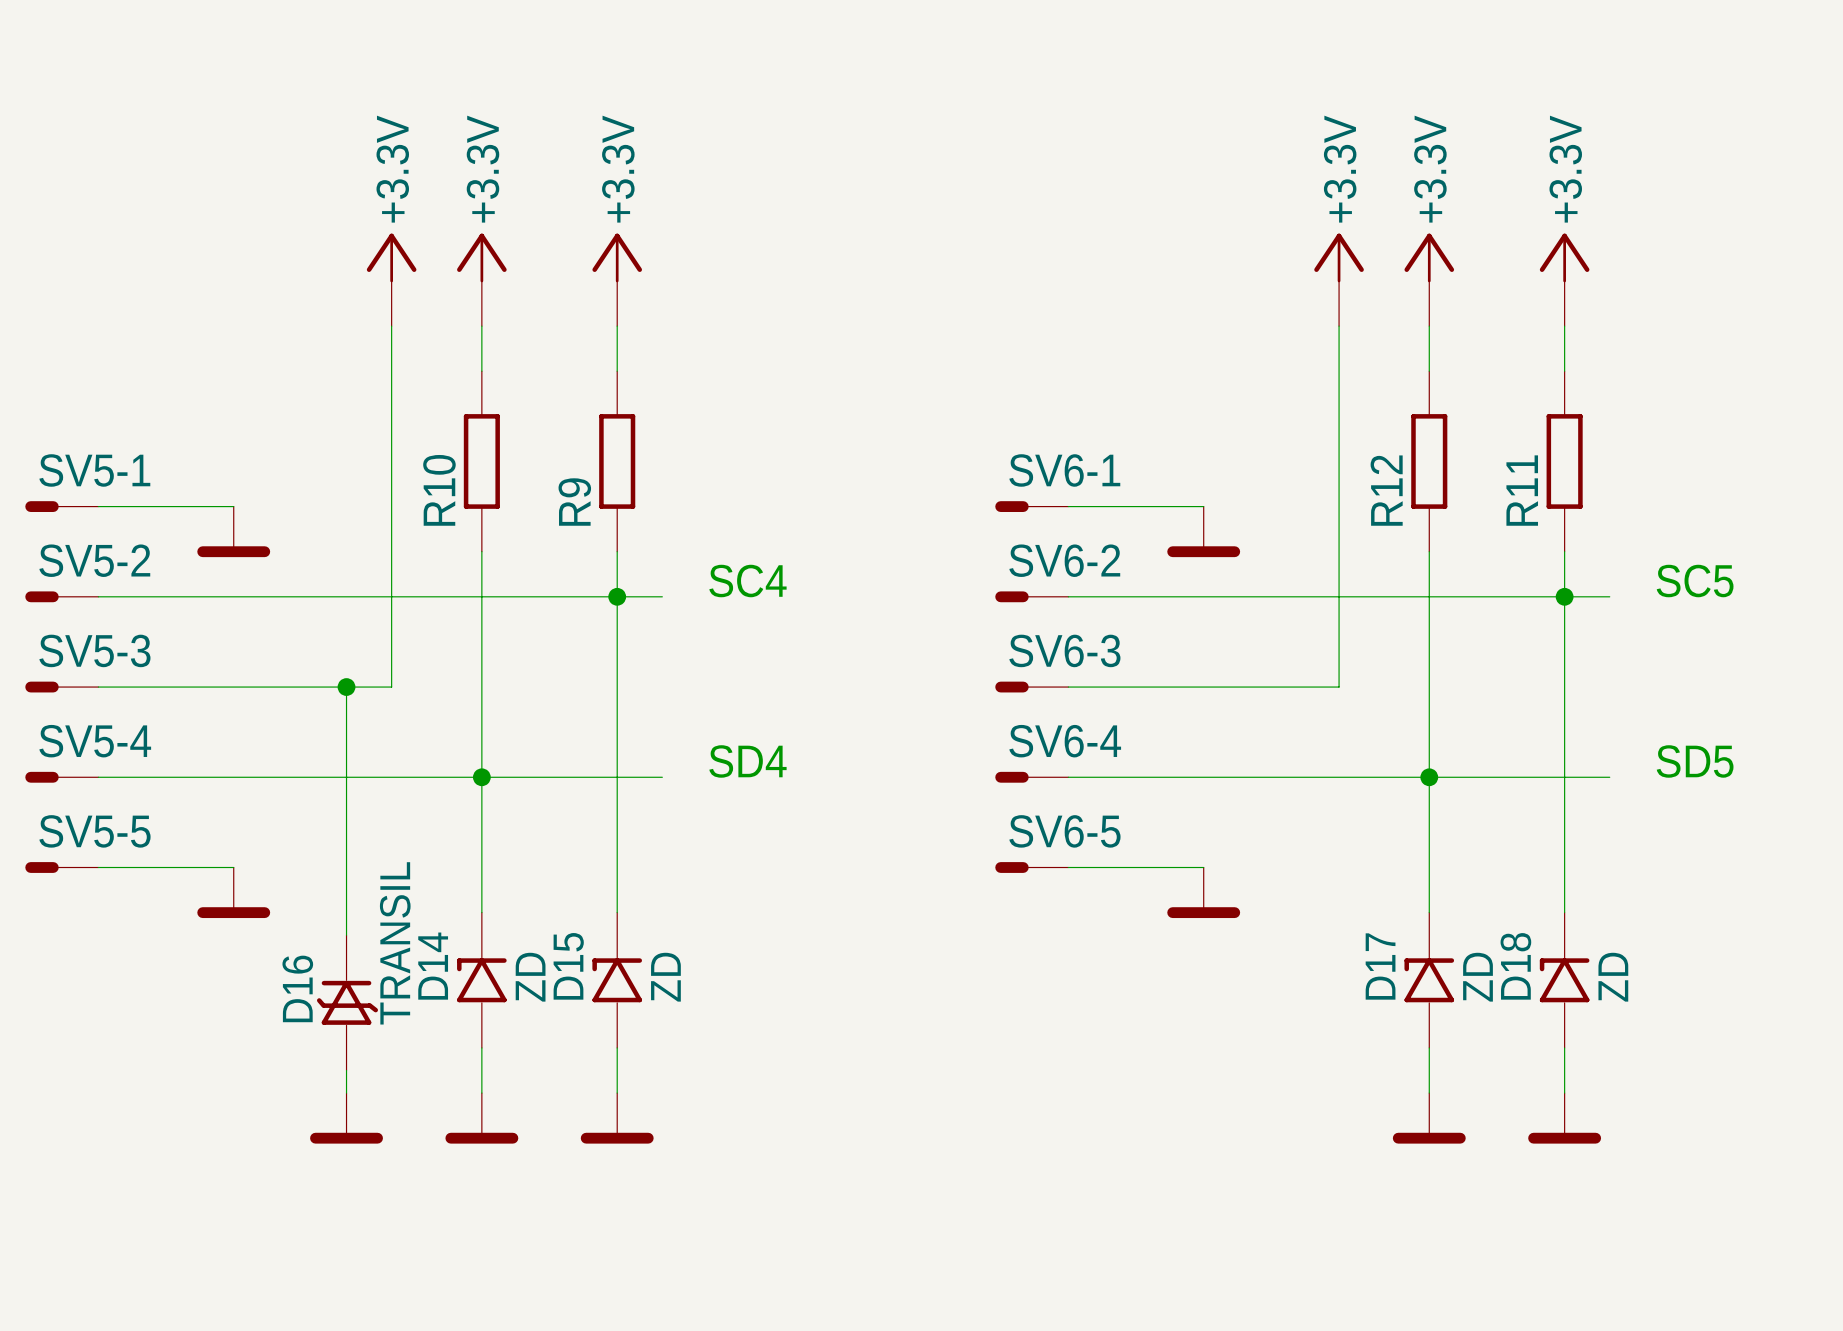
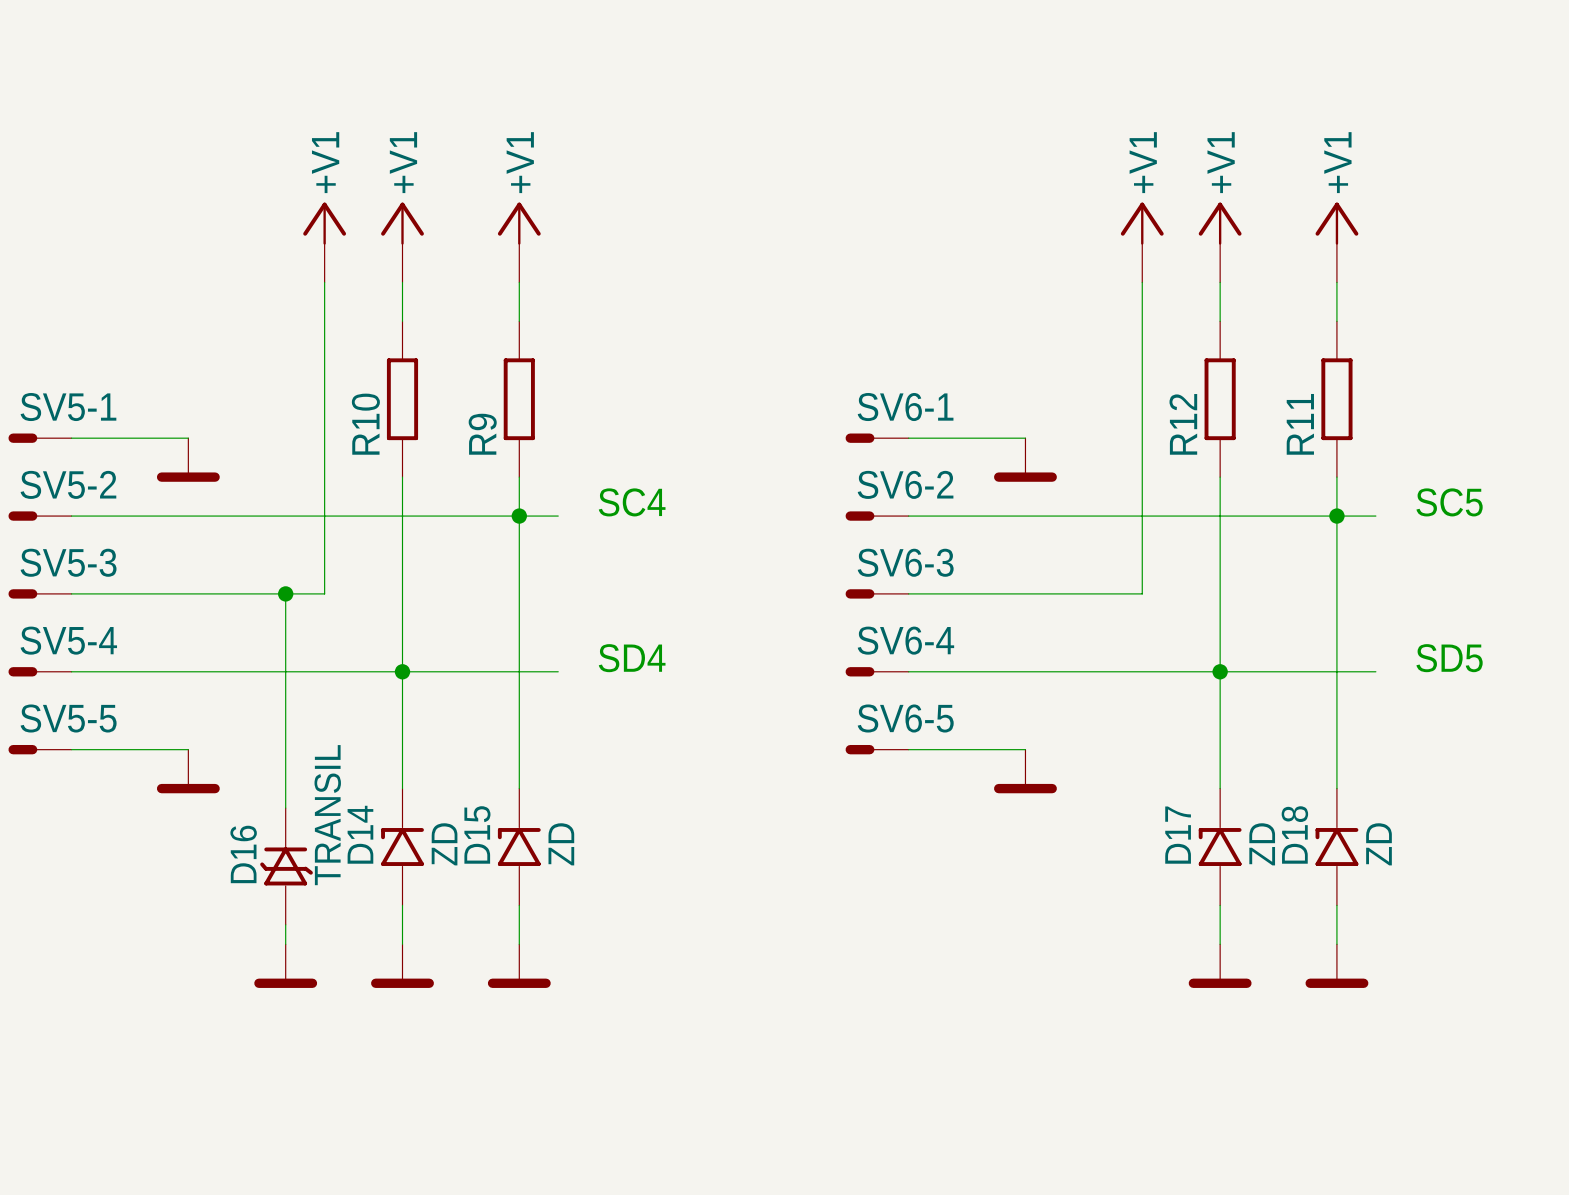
power symbol: +3.3V (391, 279) -> +V1 (324, 242)
power symbol: +3.3V (481, 279) -> +V1 (402, 242)
power symbol: +3.3V (617, 279) -> +V1 (519, 242)
power symbol: +3.3V (1339, 279) -> +V1 (1142, 242)
power symbol: +3.3V (1429, 279) -> +V1 (1220, 242)
power symbol: +3.3V (1564, 279) -> +V1 (1336, 242)

